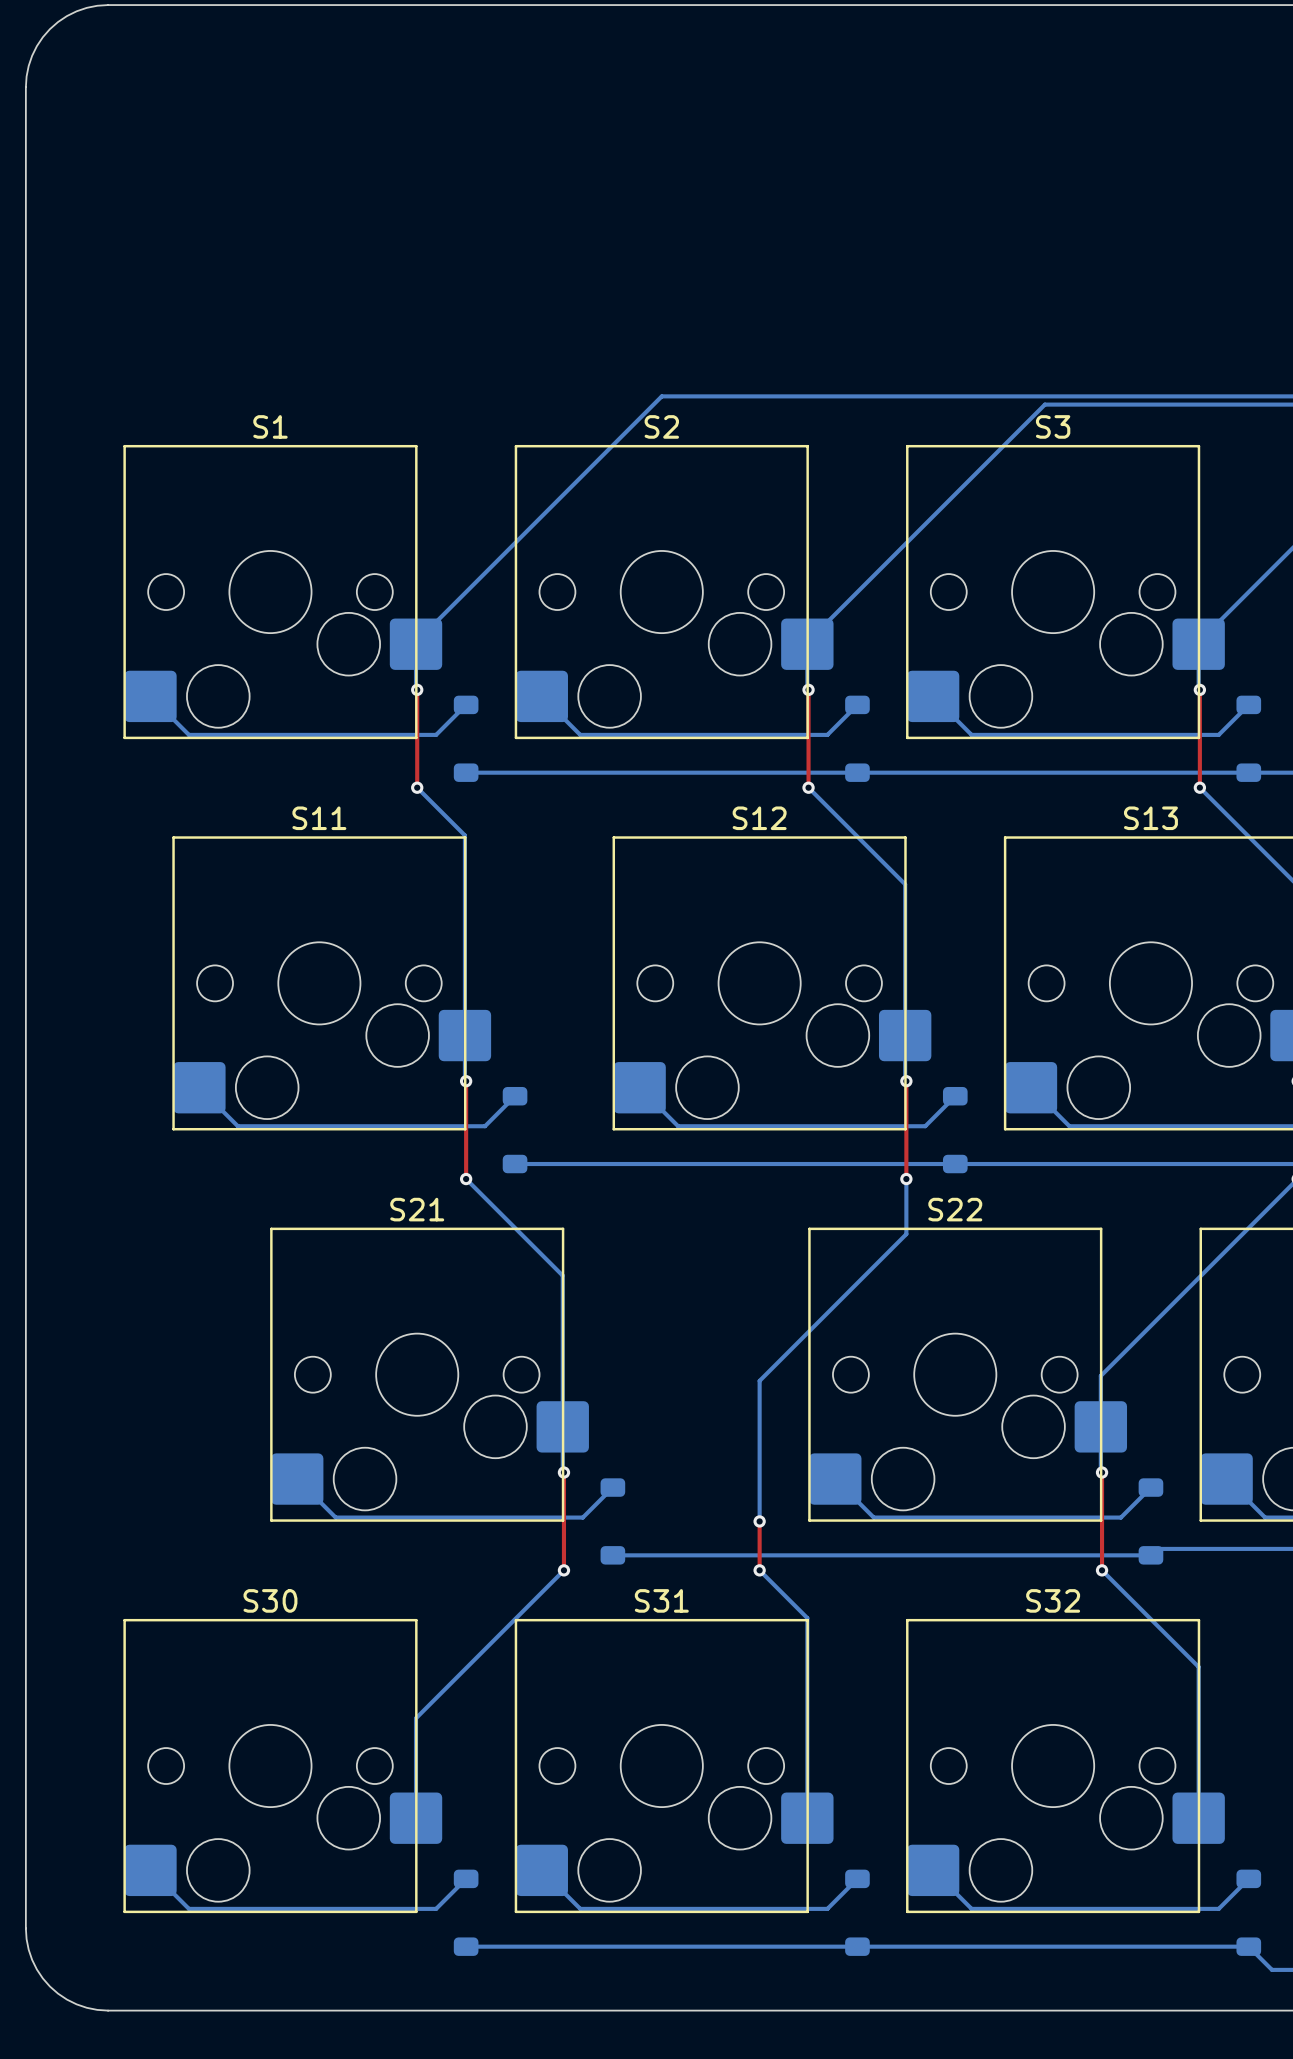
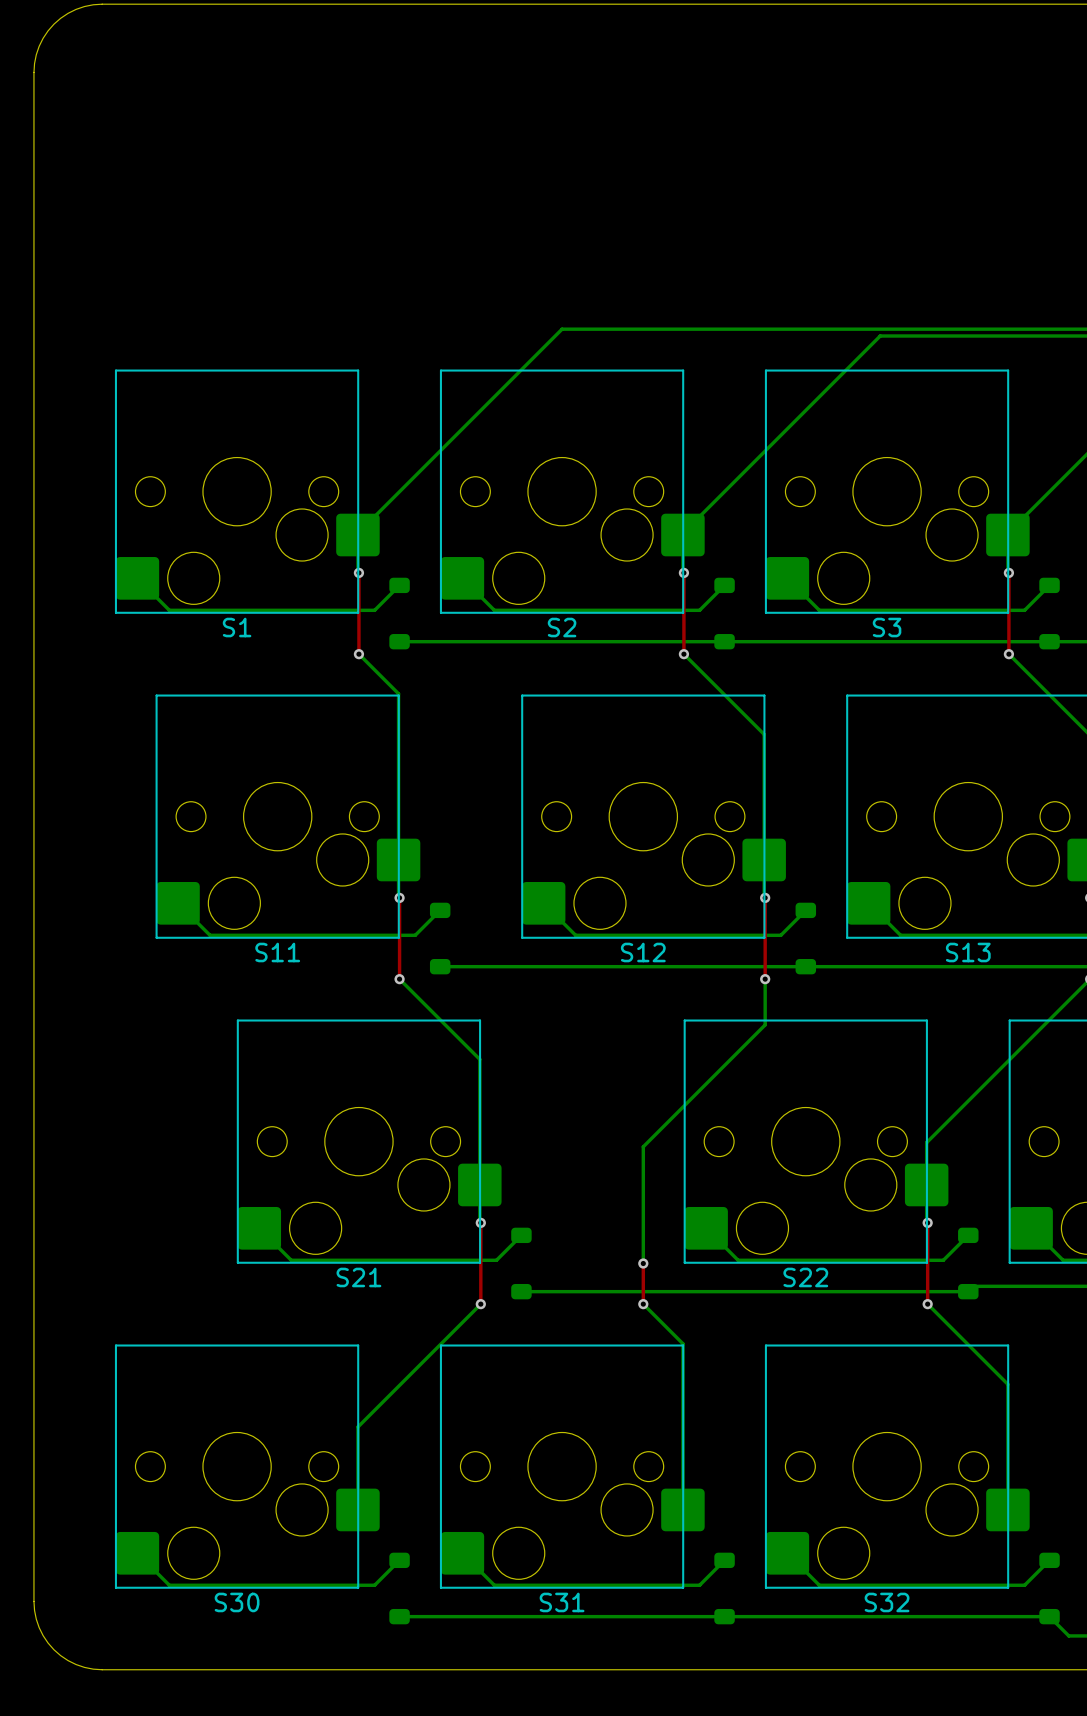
S1 name position: S1 (270, 426) -> S1 (237, 627)
S2 name position: S2 (661, 426) -> S2 (562, 627)
S3 name position: S3 (1053, 426) -> S3 (887, 627)
S11 name position: S11 (319, 818) -> S11 (277, 952)
S12 name position: S12 (759, 818) -> S12 (643, 952)
S13 name position: S13 (1150, 818) -> S13 (968, 952)
S21 name position: S21 (417, 1209) -> S21 (358, 1277)
S22 name position: S22 (955, 1209) -> S22 (805, 1277)
S30 name position: S30 (270, 1600) -> S30 (237, 1602)
S31 name position: S31 (661, 1600) -> S31 (562, 1602)
S32 name position: S32 (1053, 1600) -> S32 (887, 1602)

